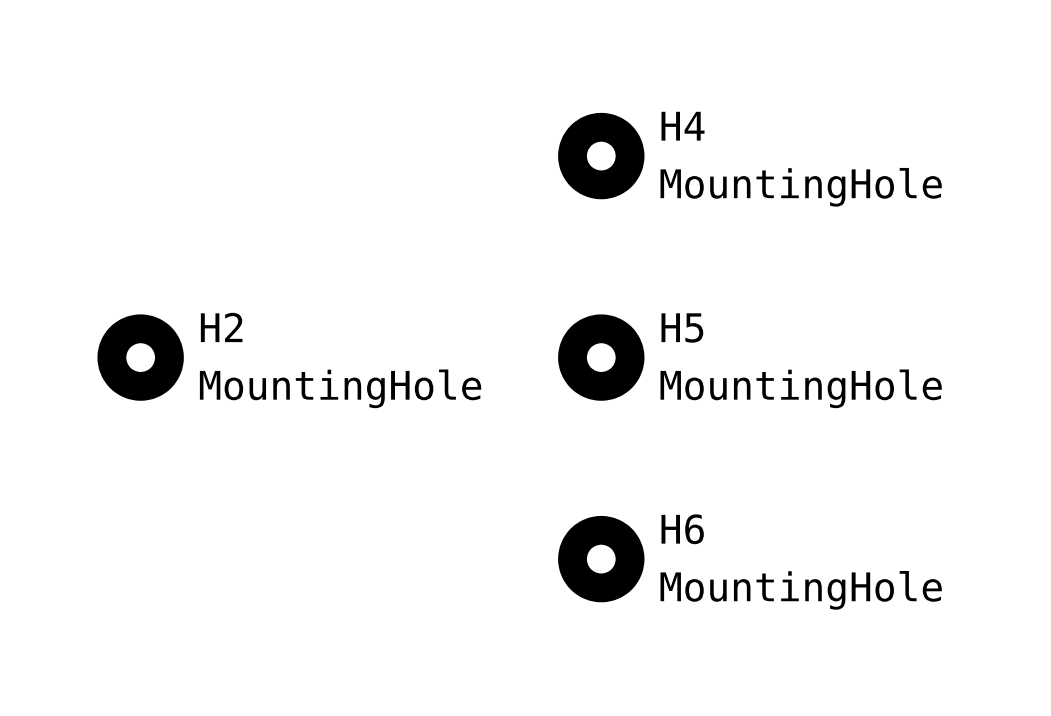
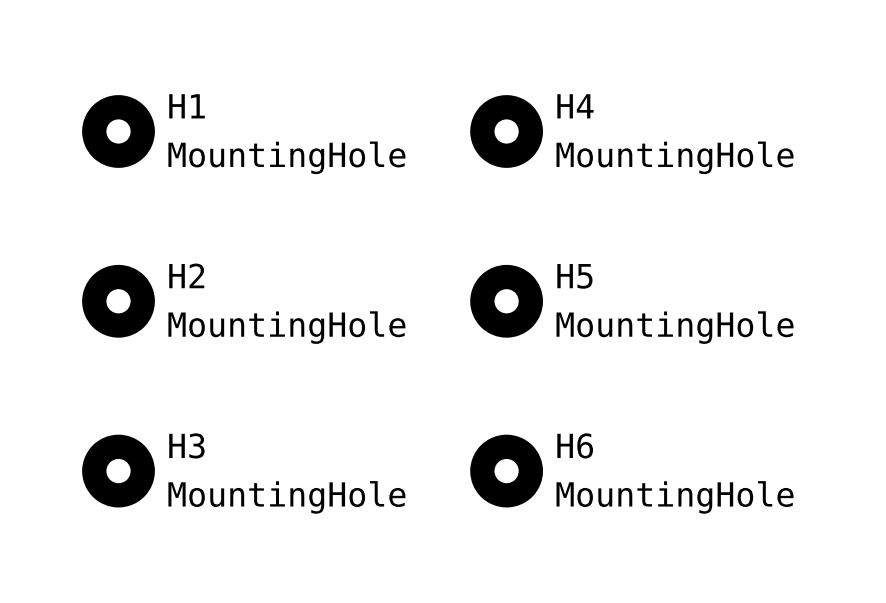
H1: none -> MountingHole (118, 131)
H3: none -> MountingHole (118, 471)

